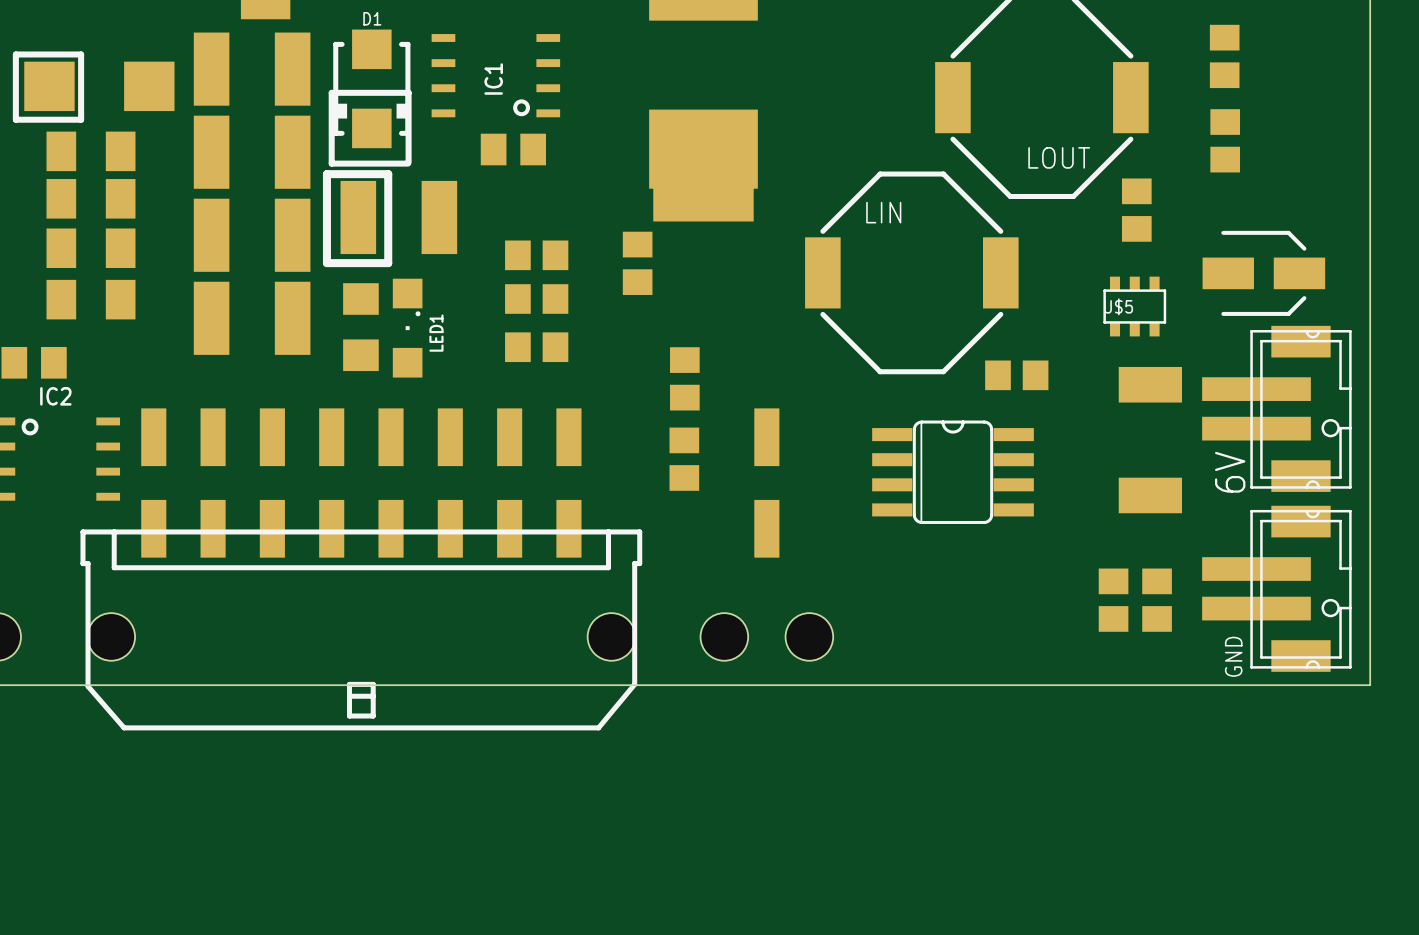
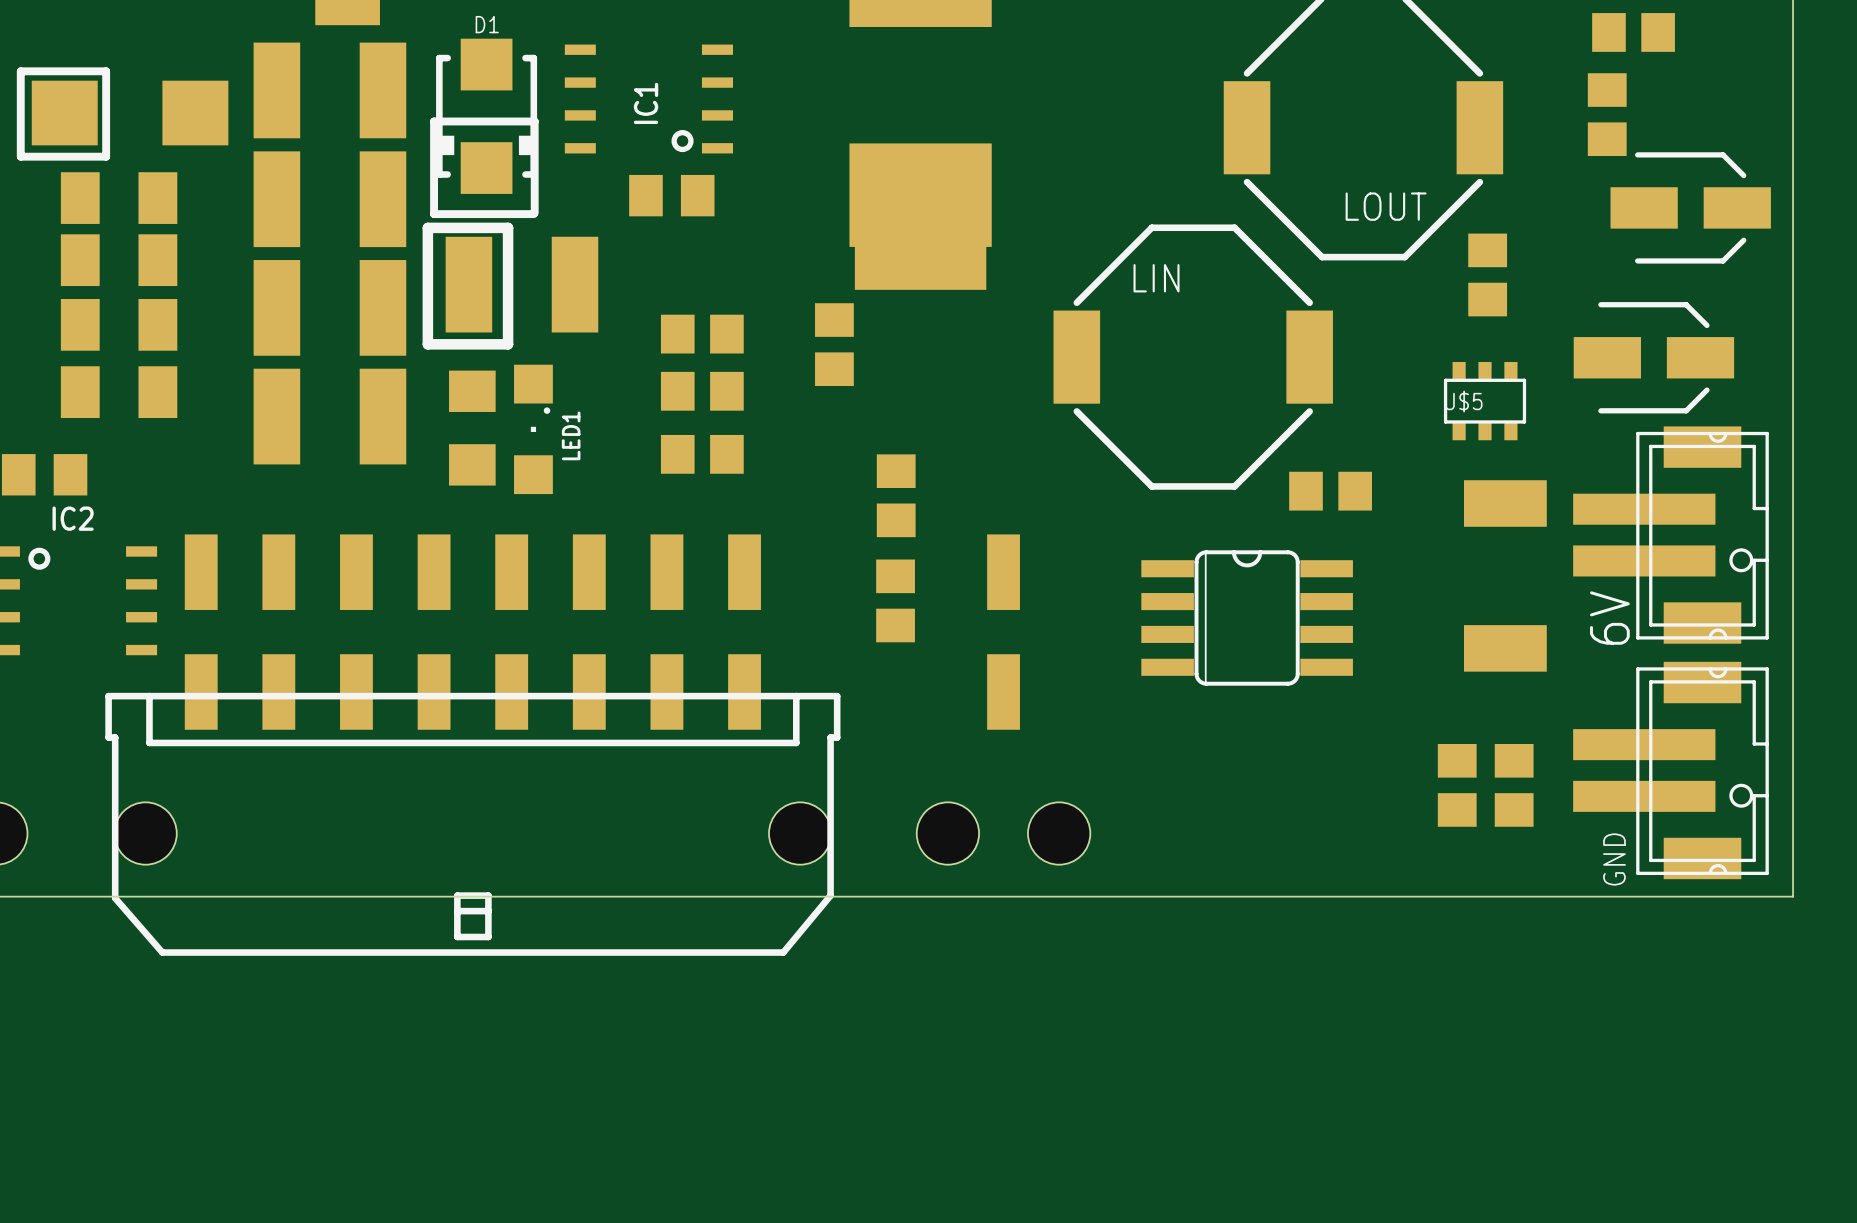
part: none -> (1633, 32)
part: (1224, 56) -> none
part: none -> (1607, 114)
part: (1225, 140) -> none
part: none -> (1690, 207)

